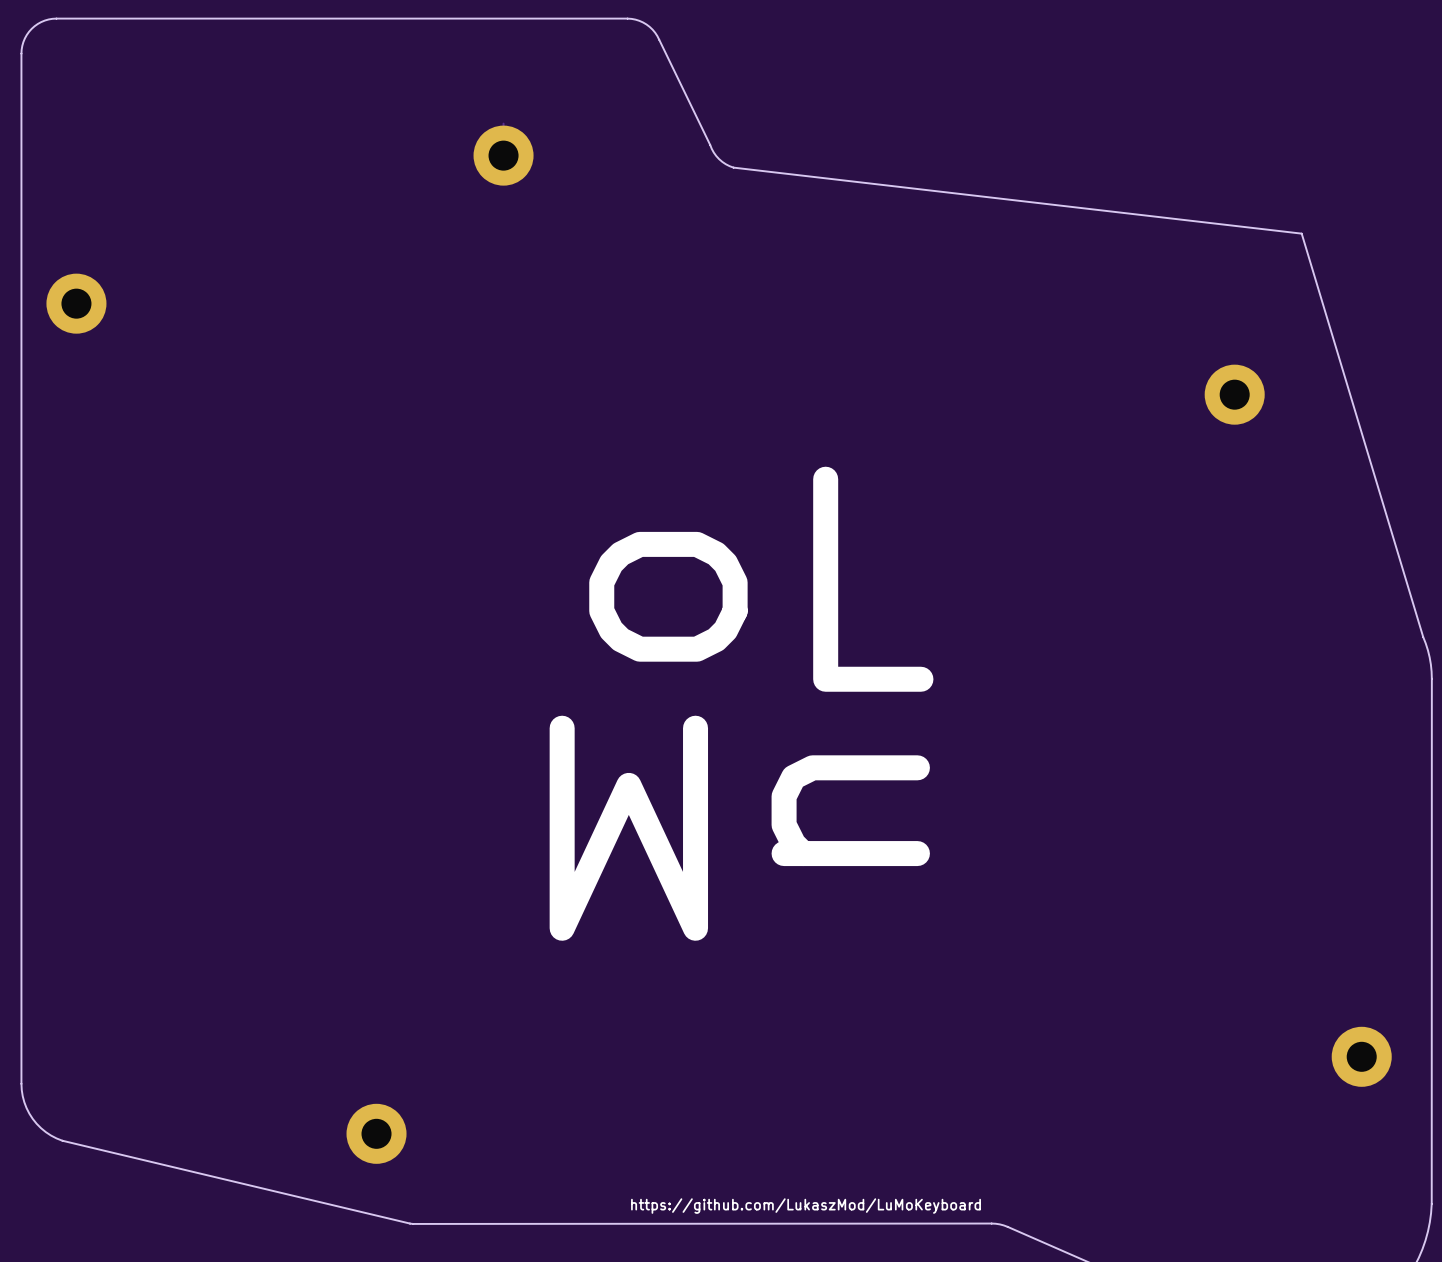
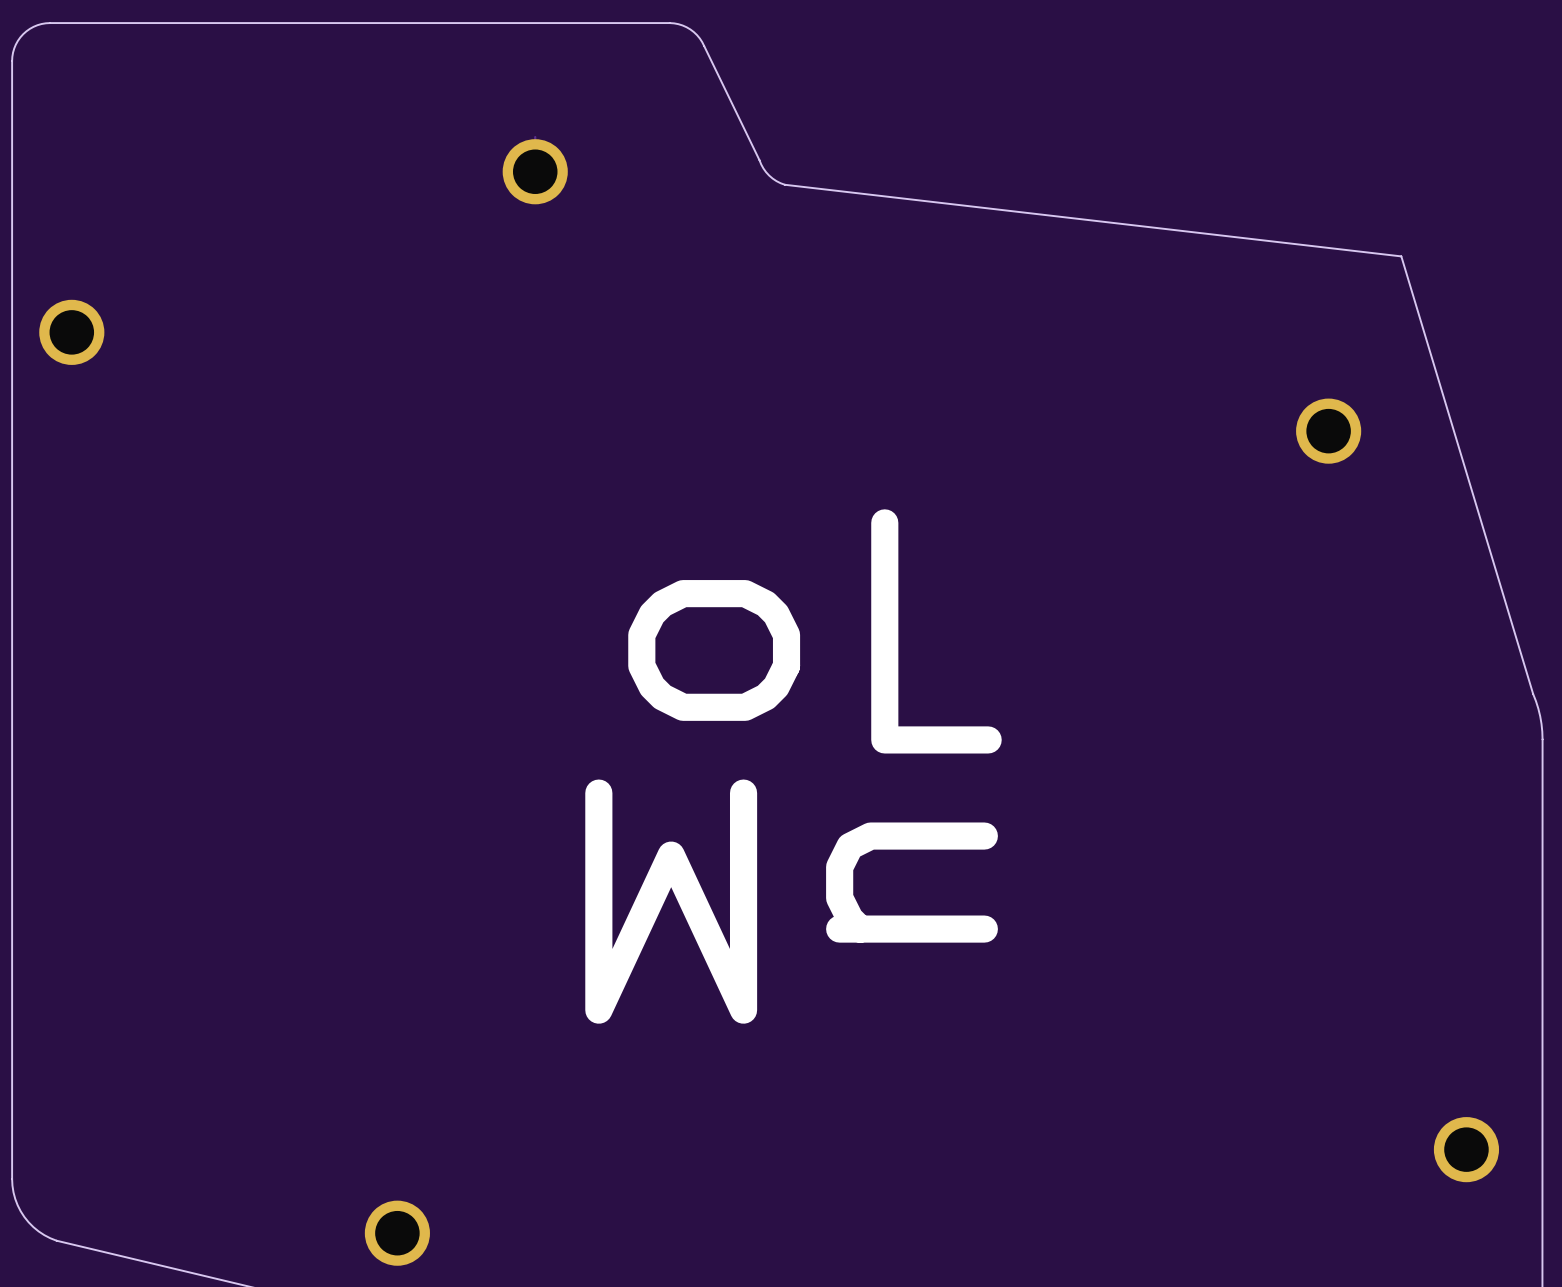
part footprint: [473, 125, 534, 186] -> [502, 139, 568, 205]
part footprint: [46, 273, 107, 334] -> [39, 299, 105, 365]
part footprint: [1204, 364, 1265, 425] -> [1296, 398, 1362, 464]
part footprint: [1331, 1026, 1392, 1087] -> [1433, 1117, 1500, 1183]
part footprint: [346, 1103, 407, 1164] -> [364, 1200, 430, 1266]

